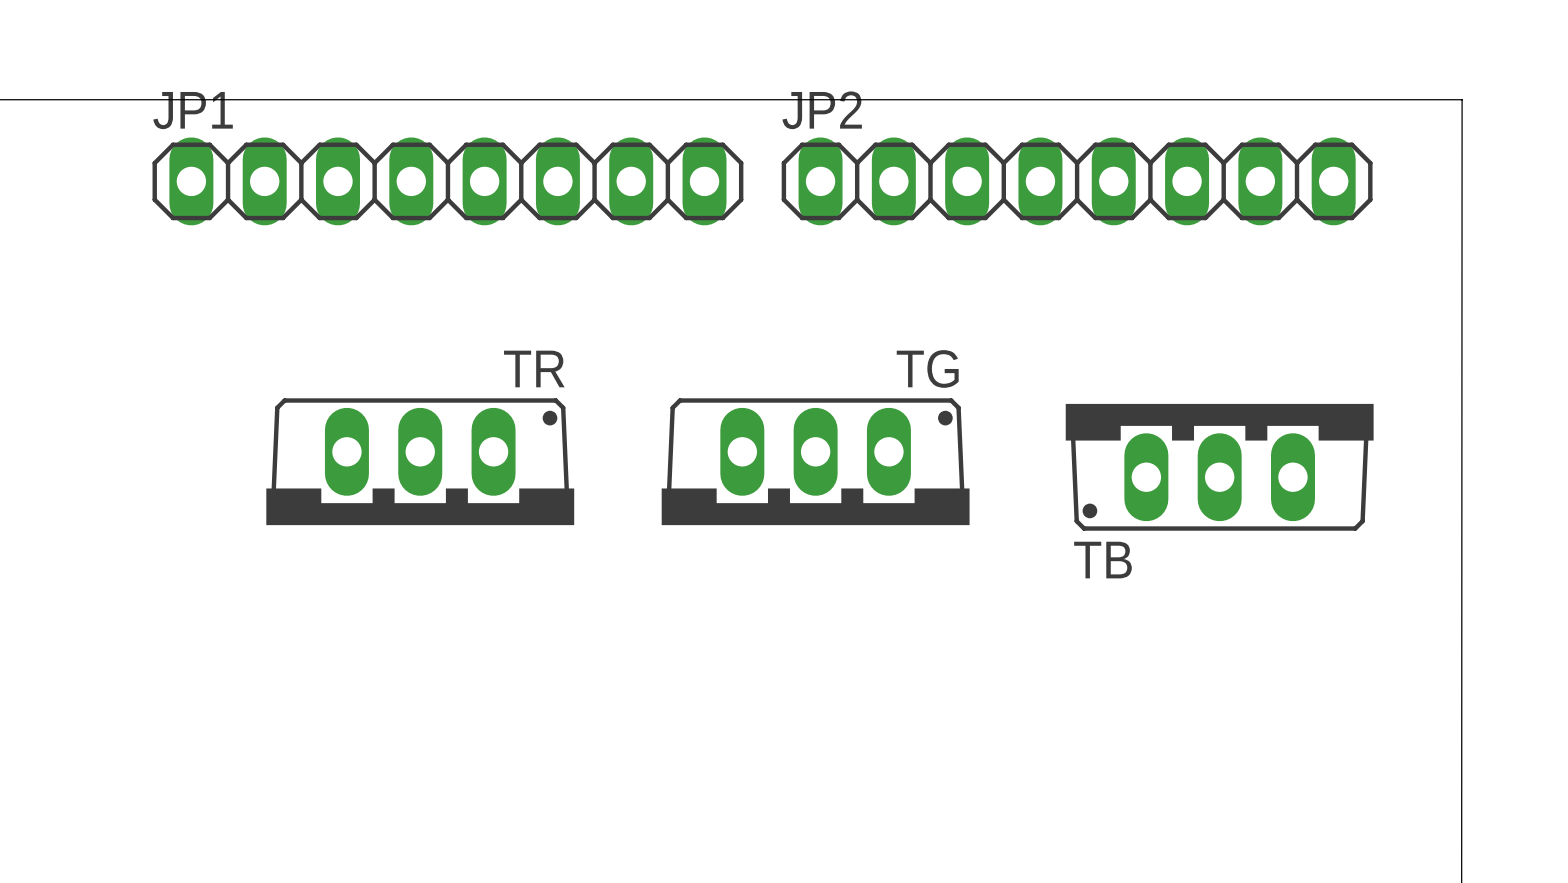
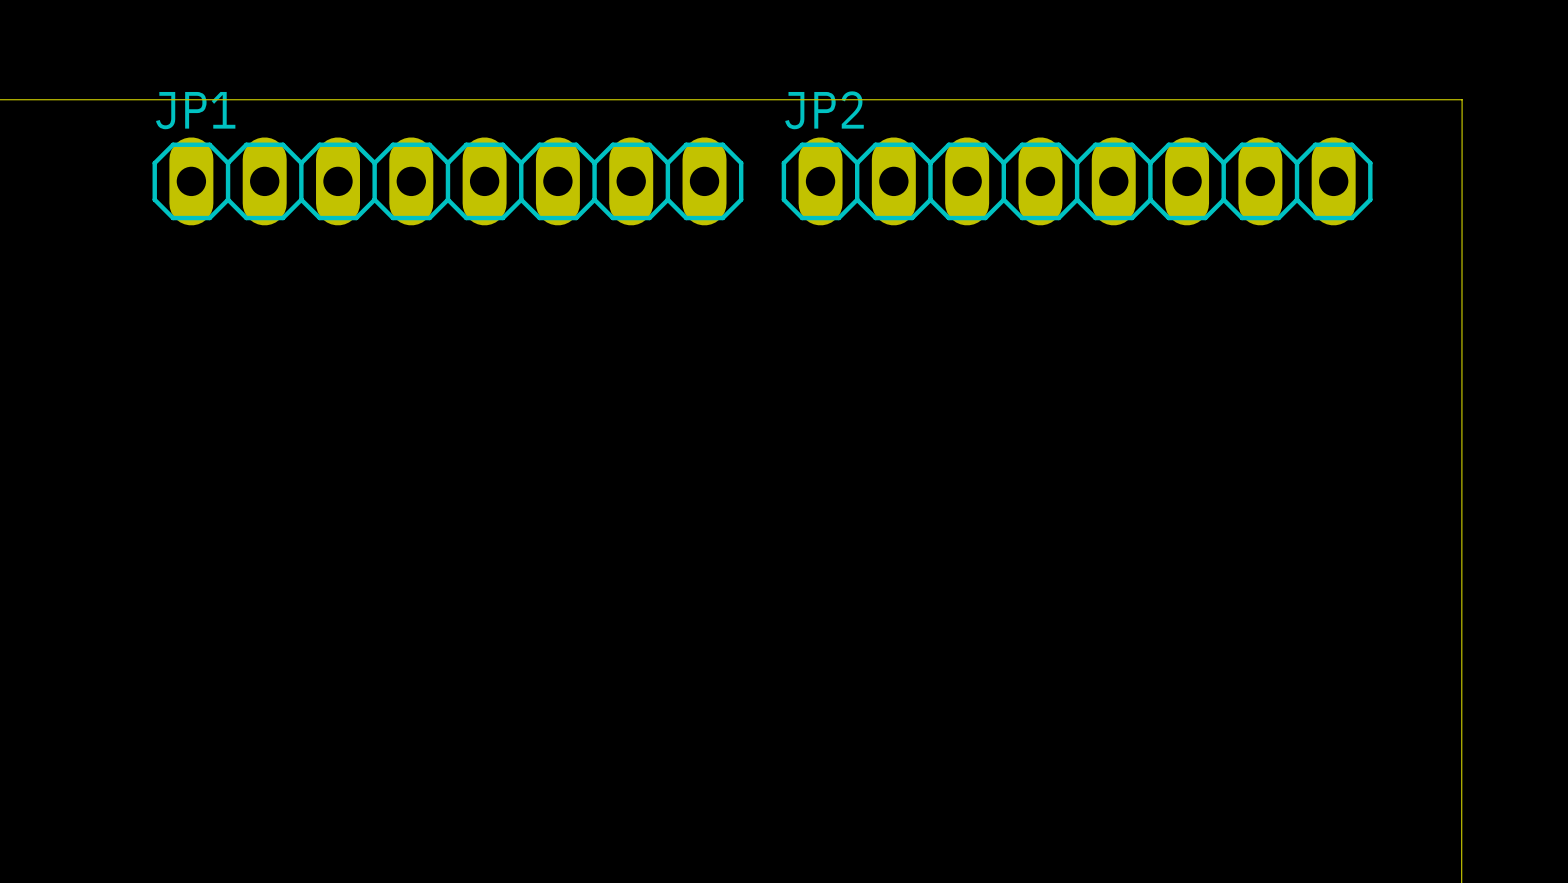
TR: (420, 461) -> none
TG: (815, 461) -> none
TB: (1219, 467) -> none

